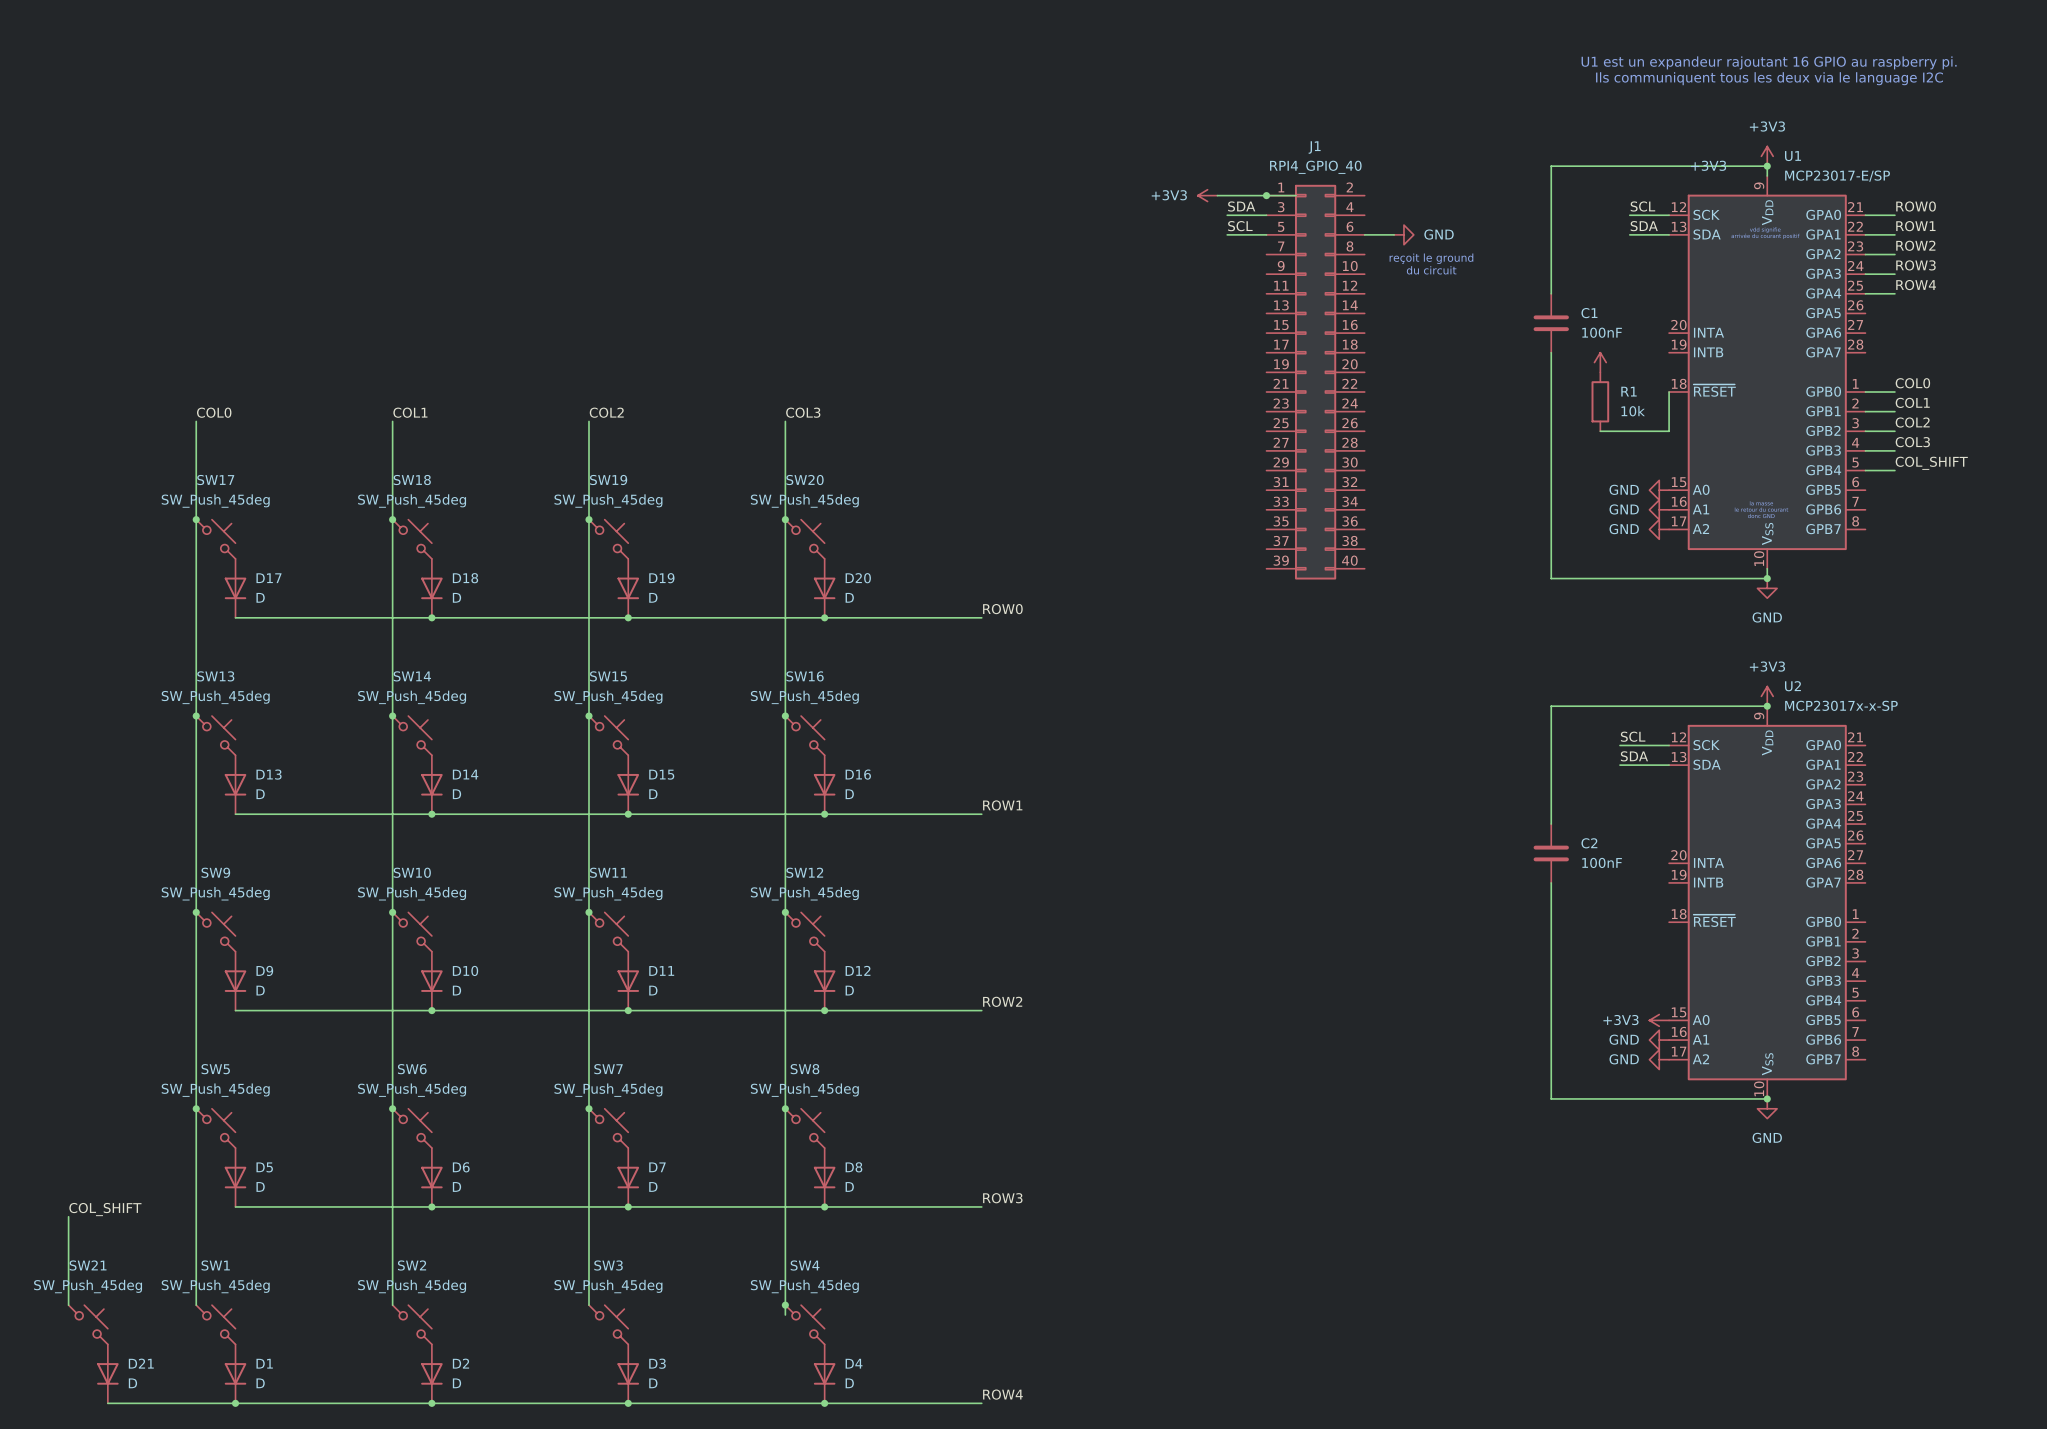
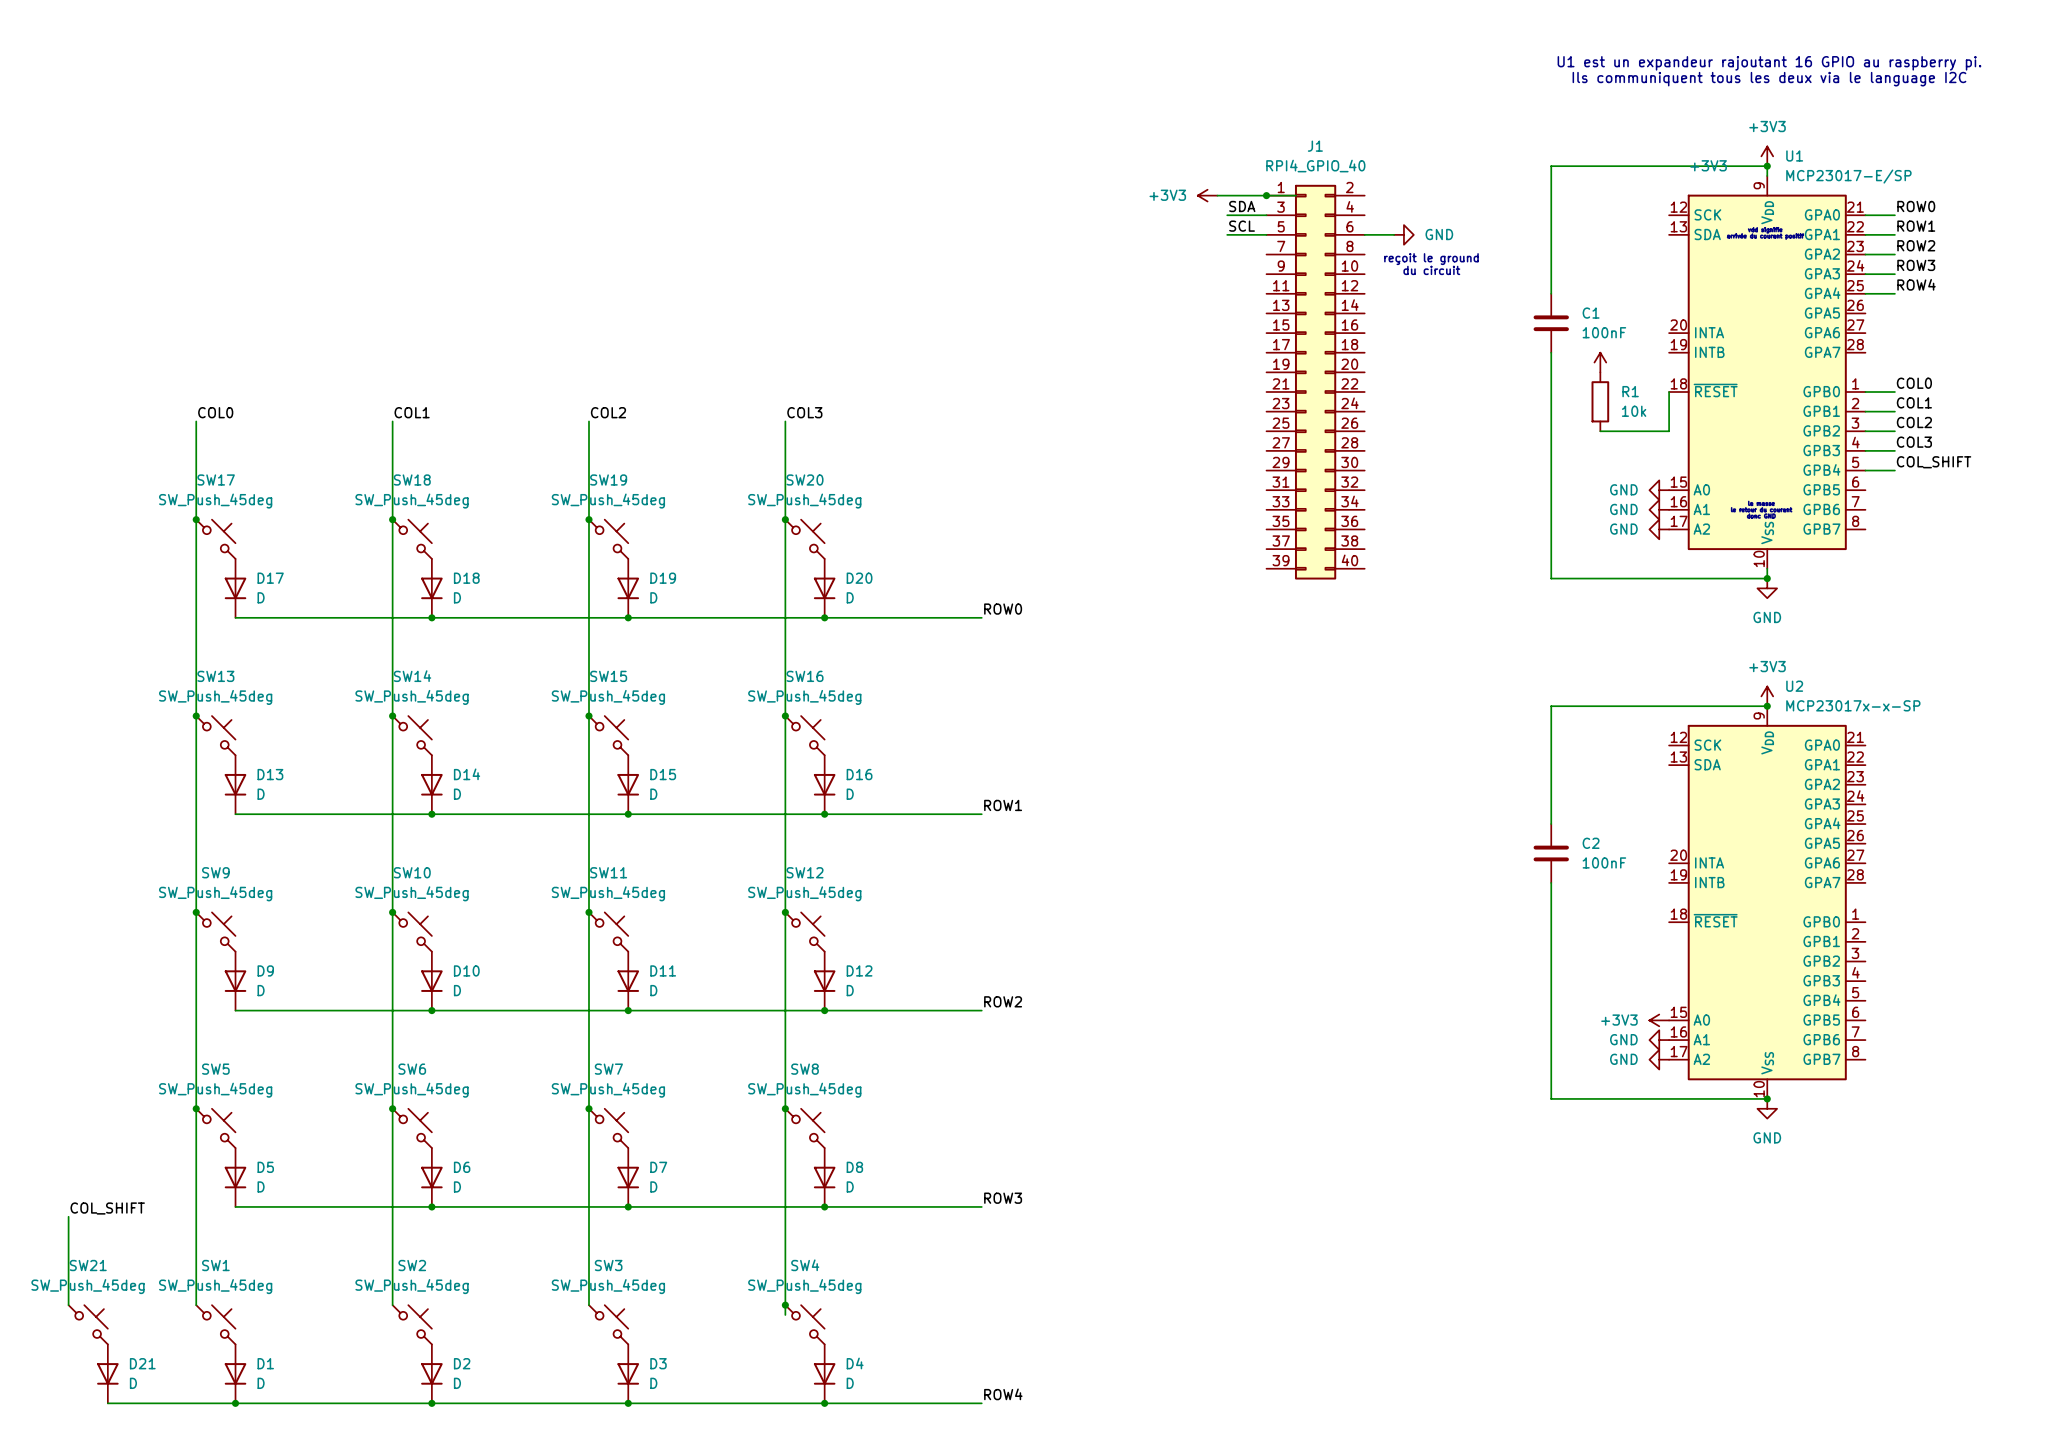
label: SCL (1642, 206) -> none
wire: (1629, 215) (1669, 215) -> none
label: SDA (1644, 226) -> none
wire: (1629, 234) (1669, 234) -> none
label: SCL (1633, 736) -> none
wire: (1619, 745) (1669, 745) -> none
label: SDA (1634, 756) -> none
wire: (1619, 765) (1669, 765) -> none

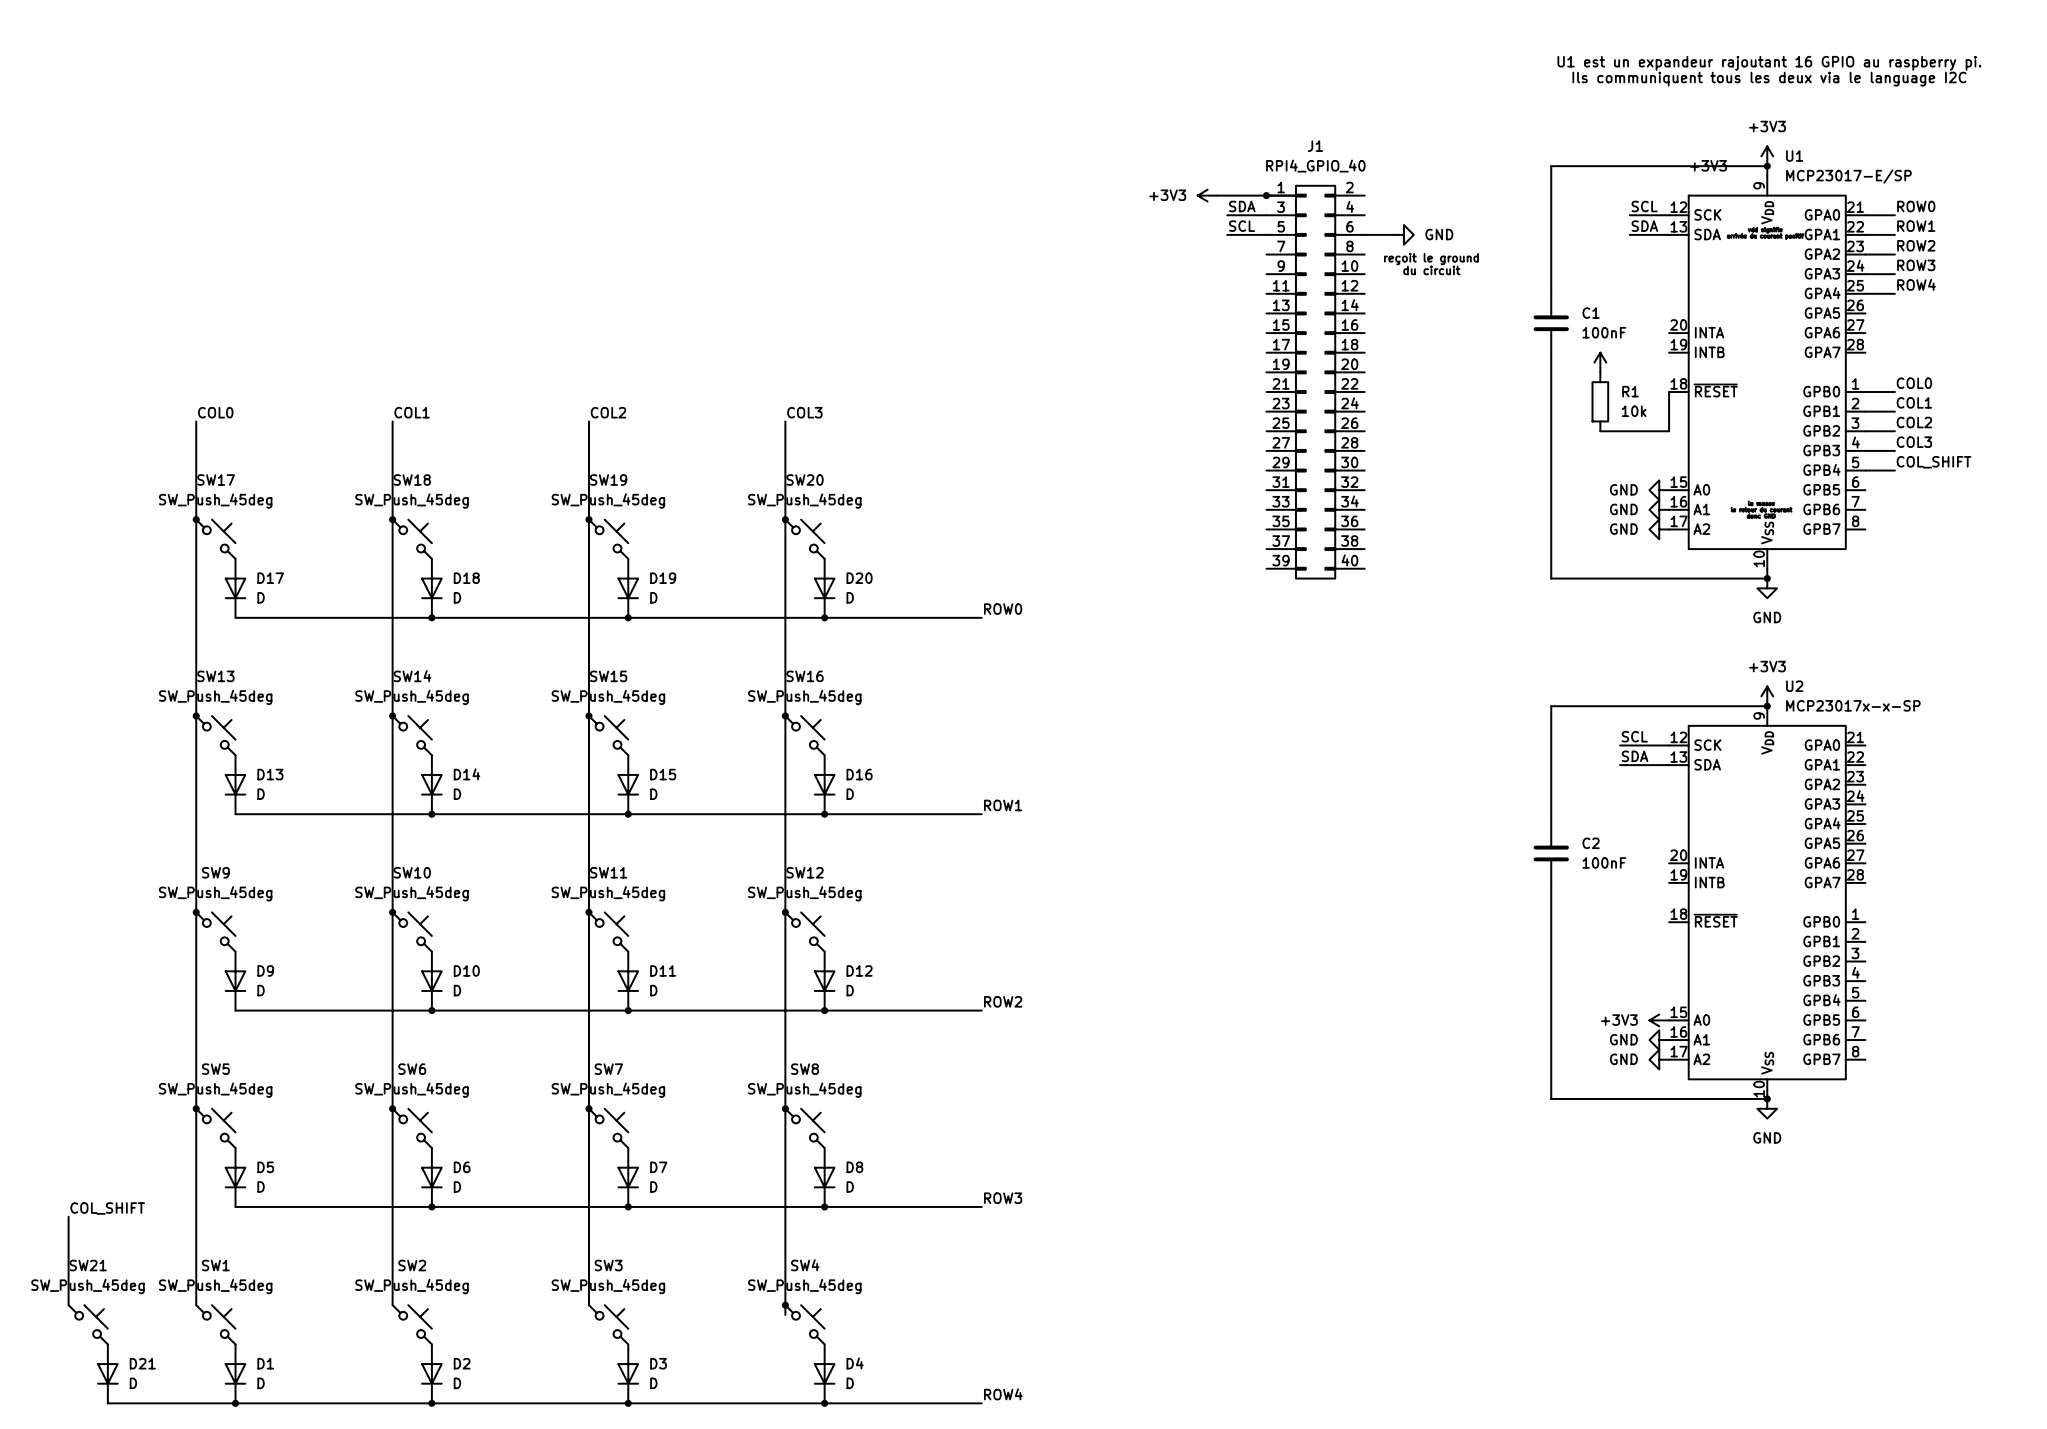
label: none -> SCL (1644, 206)
wire: none -> (1629, 215) (1669, 215)
label: none -> SDA (1644, 226)
wire: none -> (1629, 234) (1669, 234)
label: none -> SCL (1634, 736)
wire: none -> (1619, 745) (1669, 745)
label: none -> SDA (1635, 756)
wire: none -> (1619, 765) (1669, 765)

